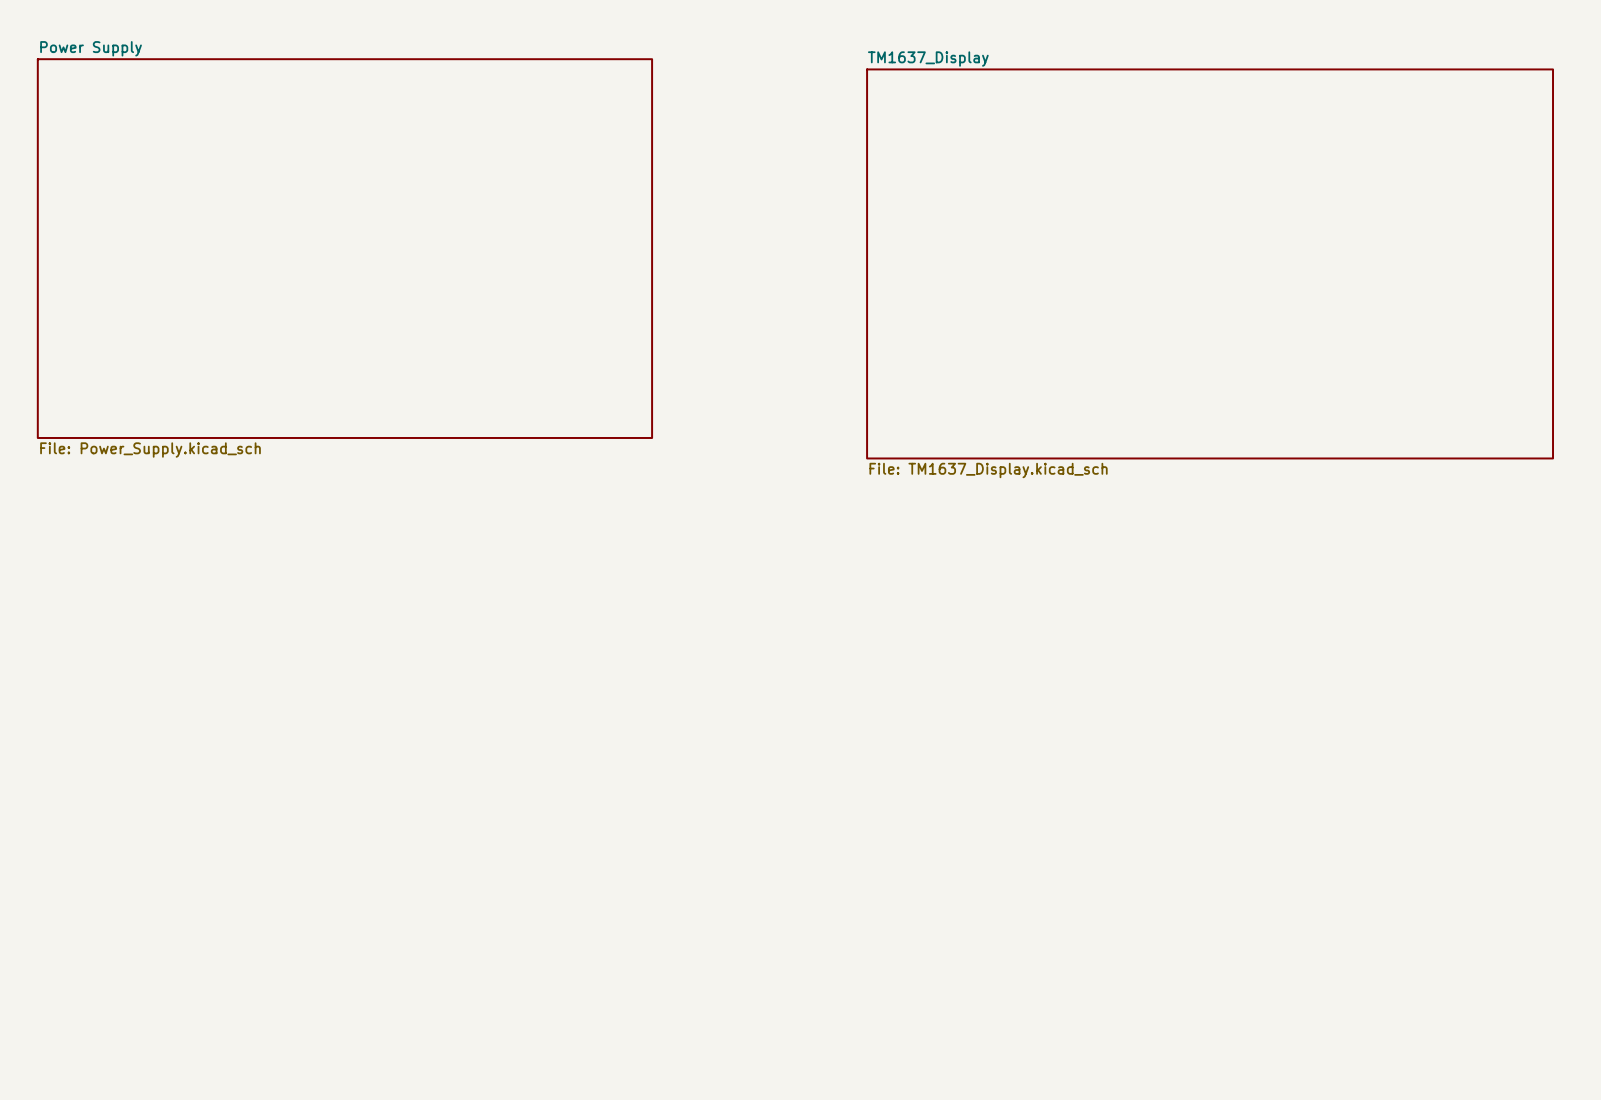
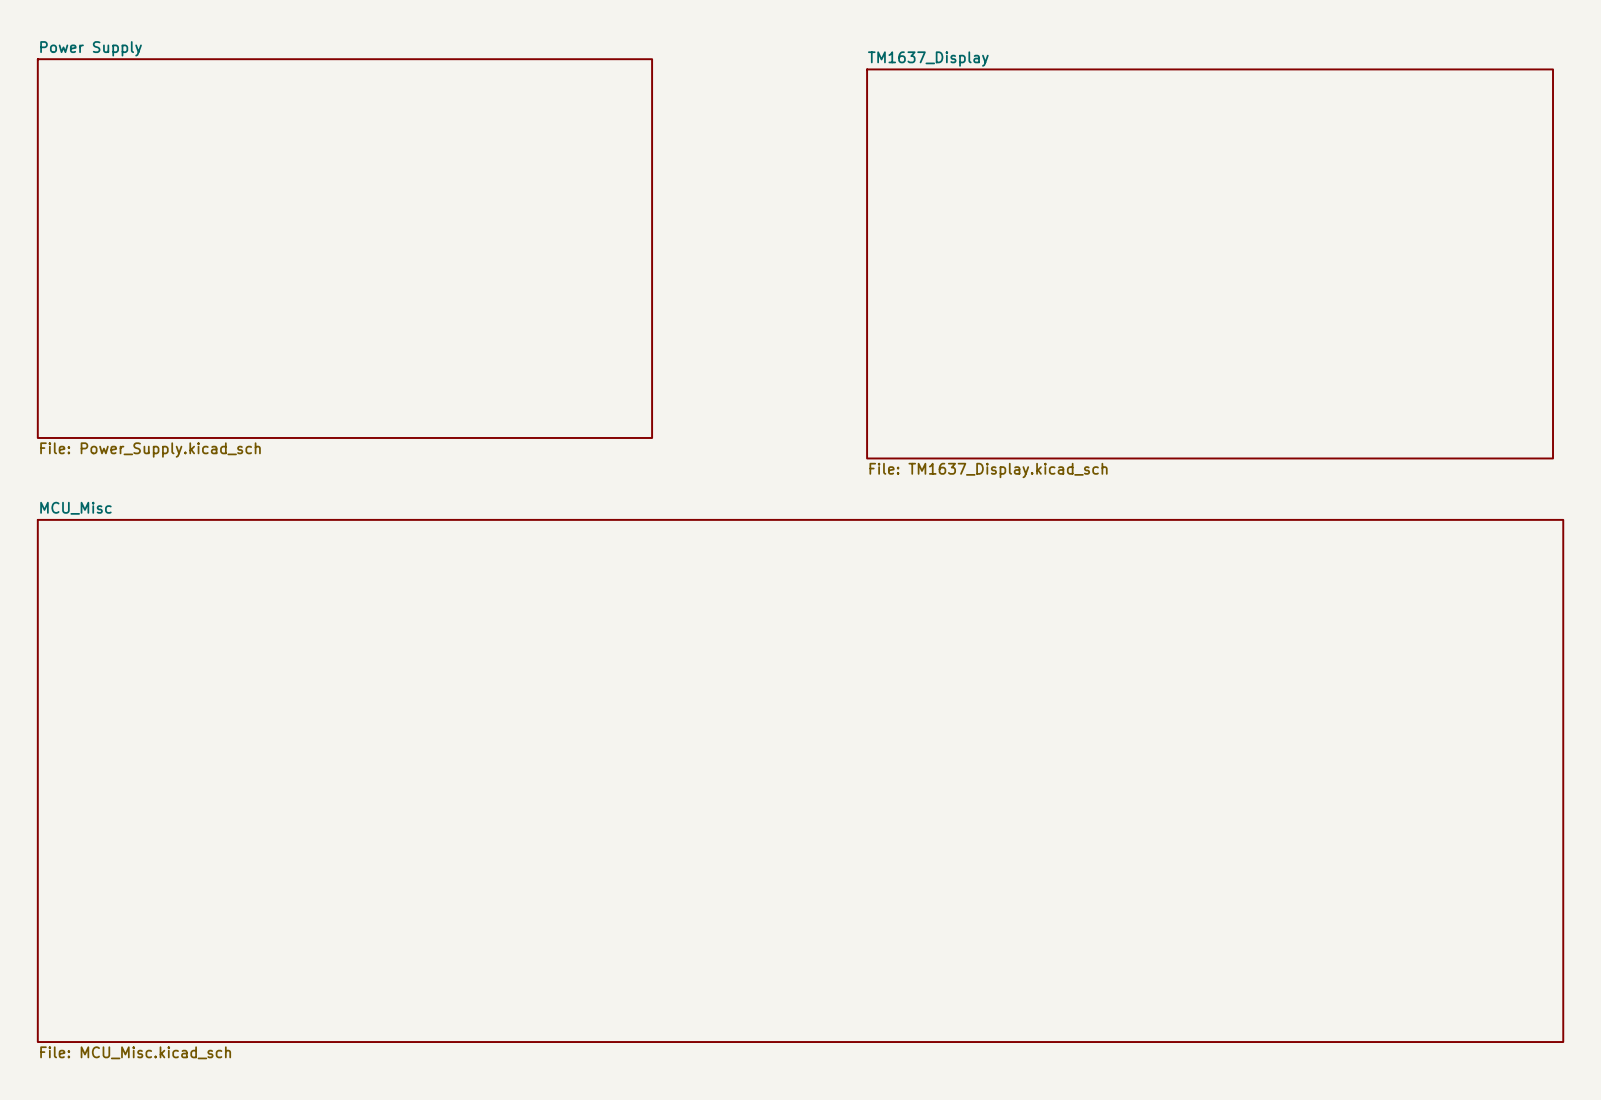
sheet MCU_Misc: none -> File: MCU_Misc.kicad_sch (800, 780)

